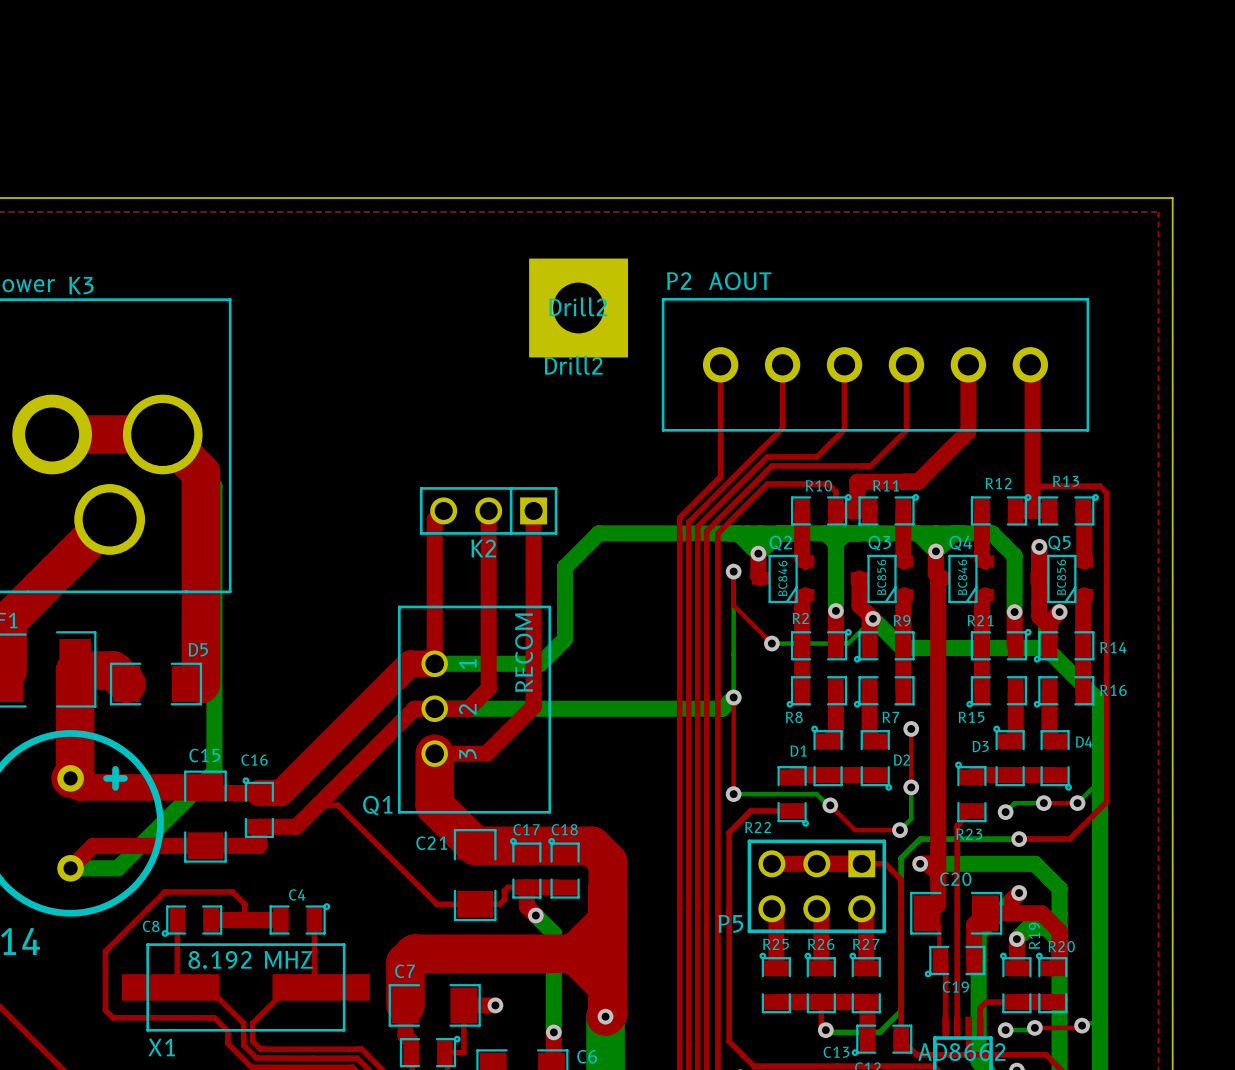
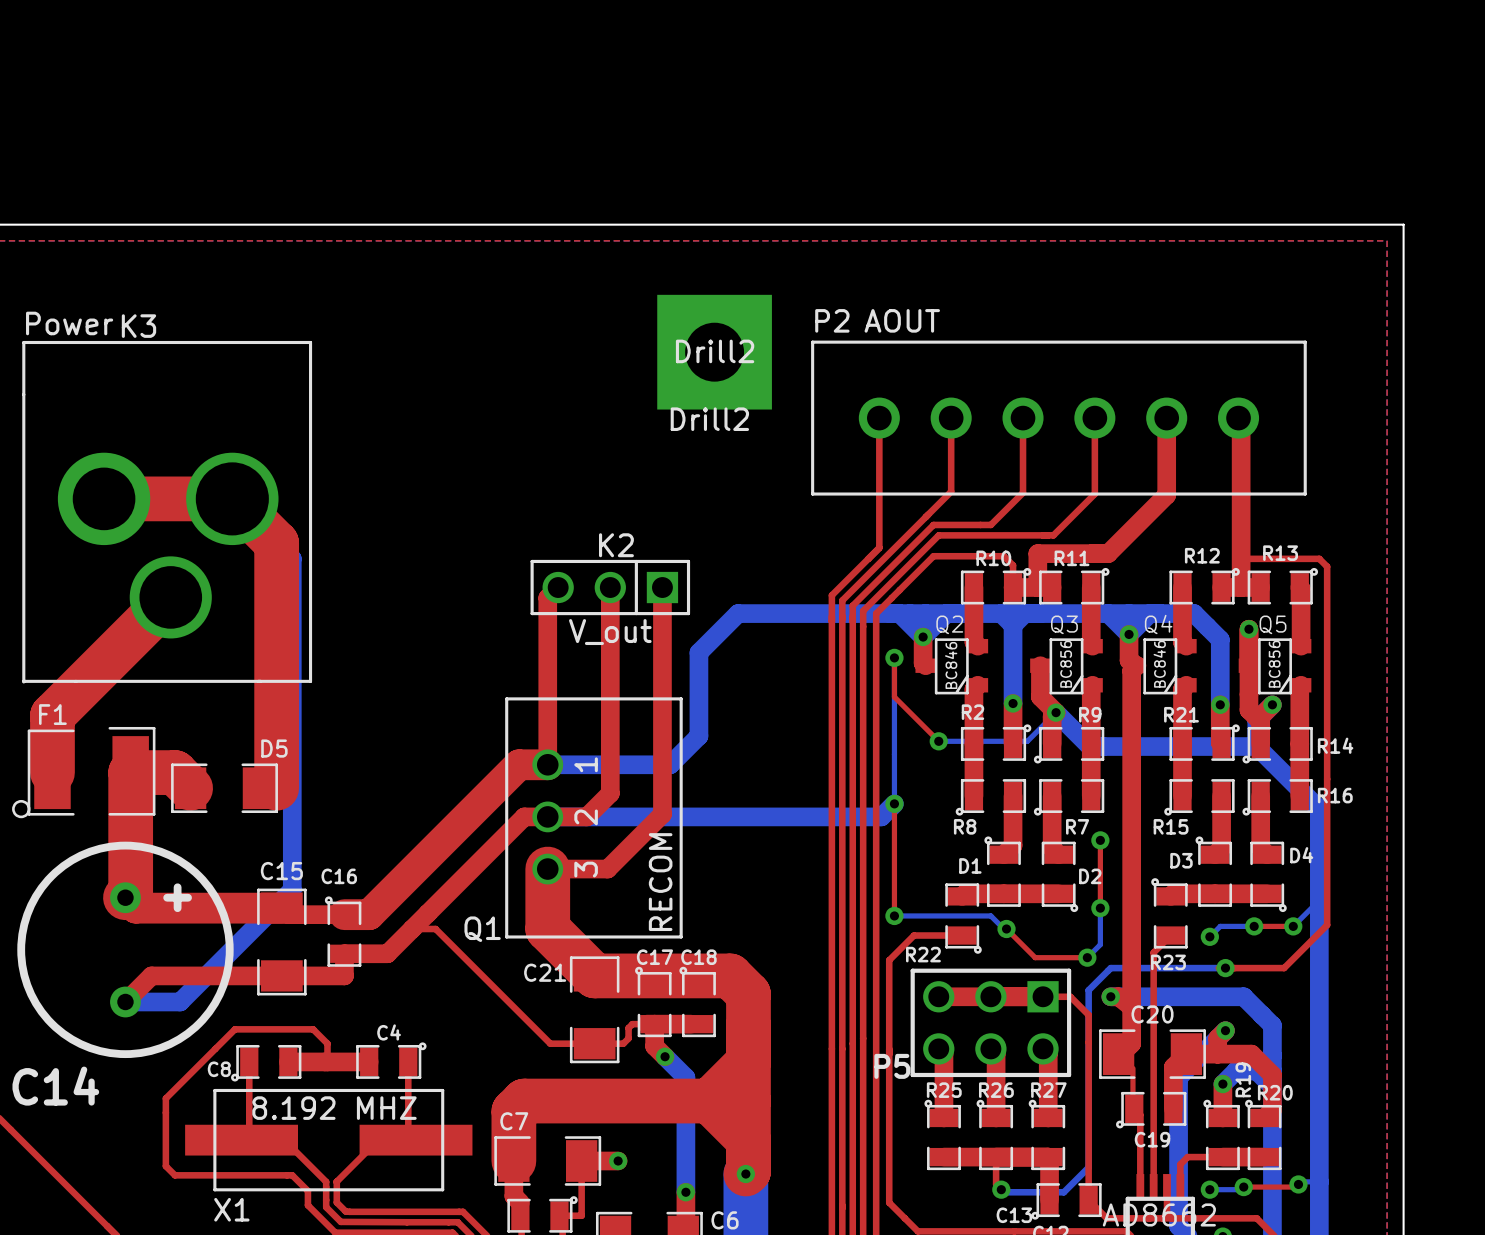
K2 name position: K2 (483, 548) -> K2 (616, 545)
K2 value: none -> V_out (610, 632)
Q1 value position: RECOM (524, 652) -> RECOM (660, 882)

